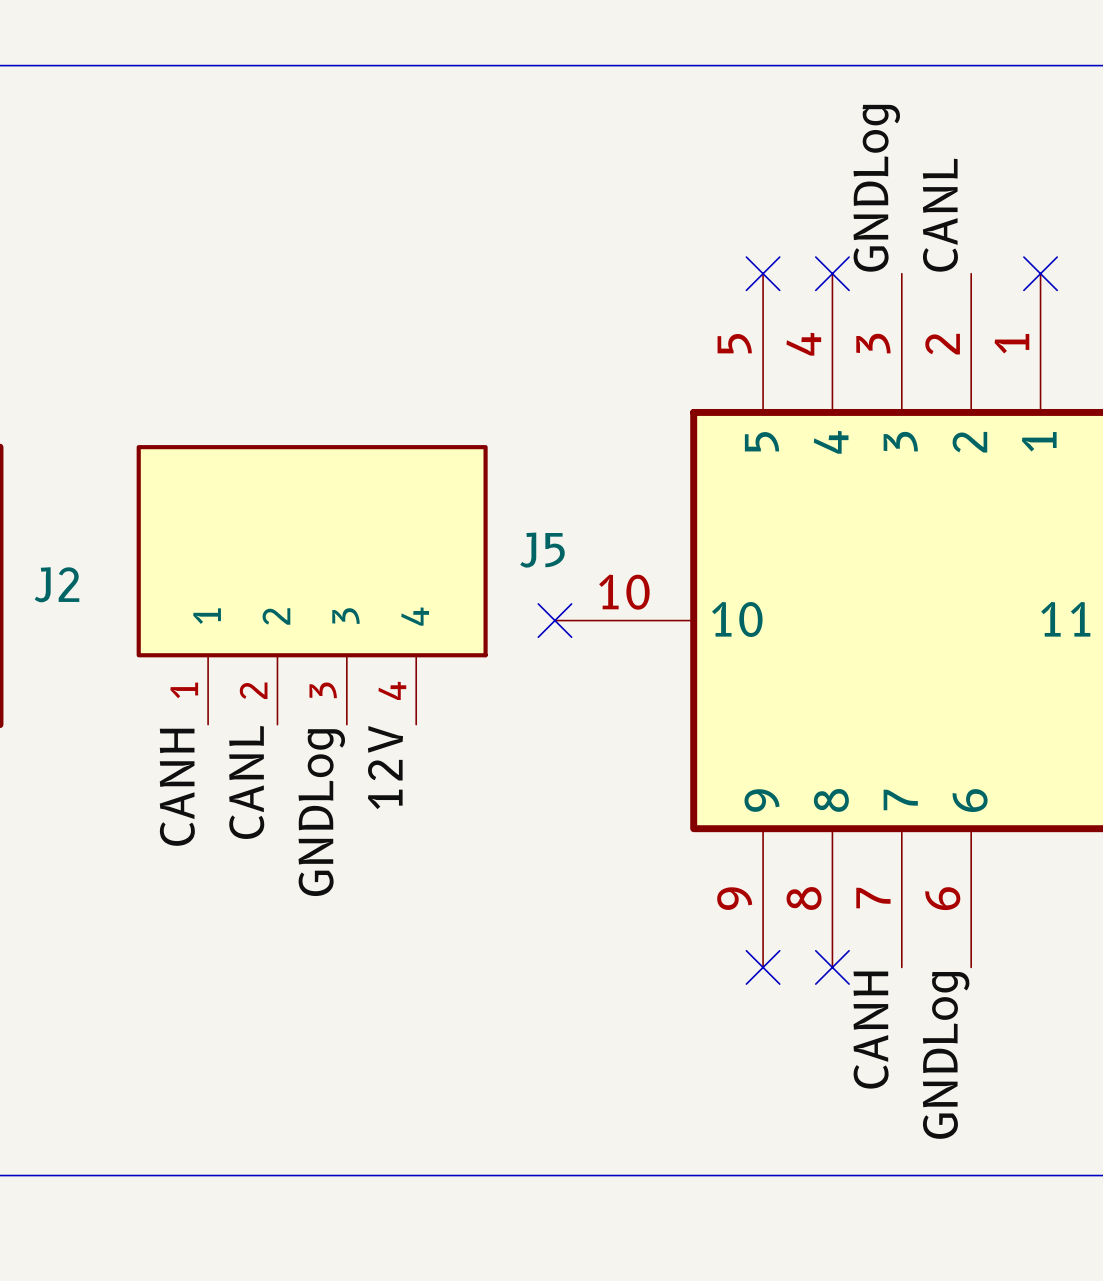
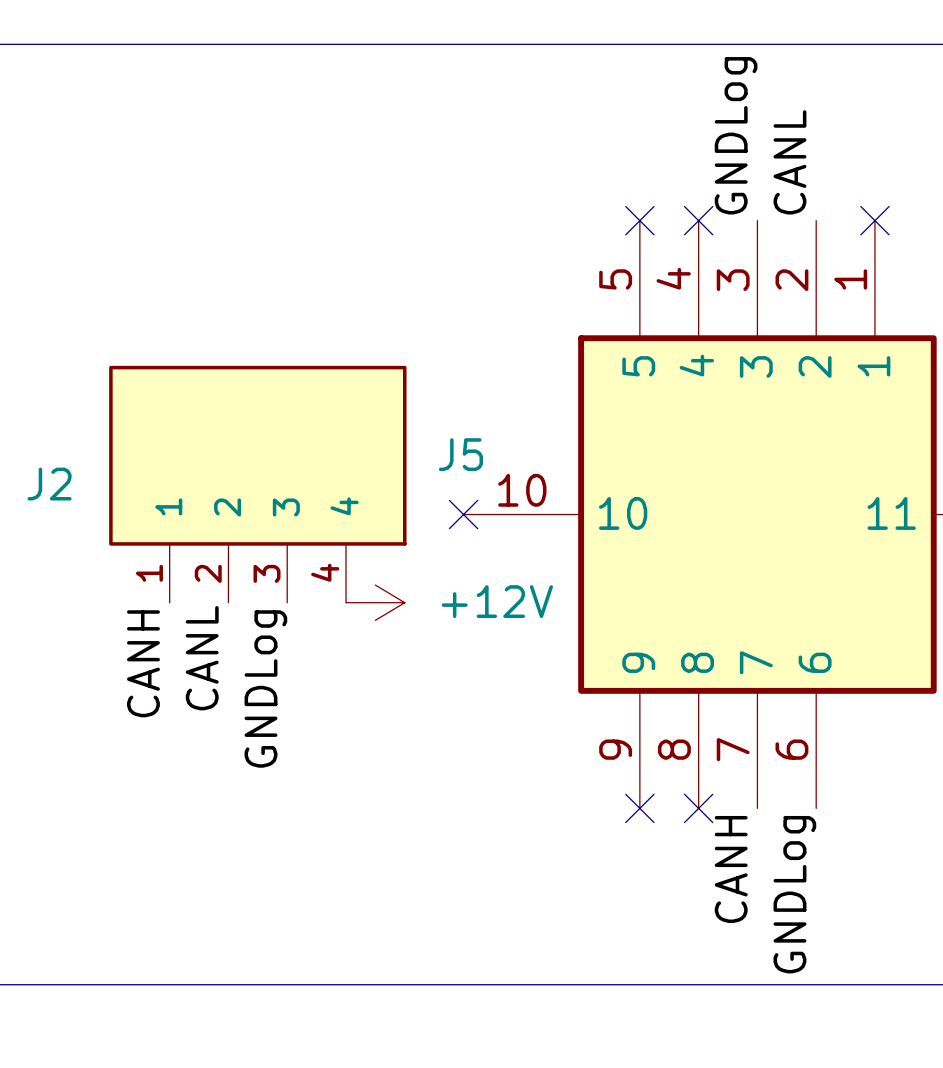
power symbol: none -> +12V (375, 602)
label: 12V (385, 767) -> none

